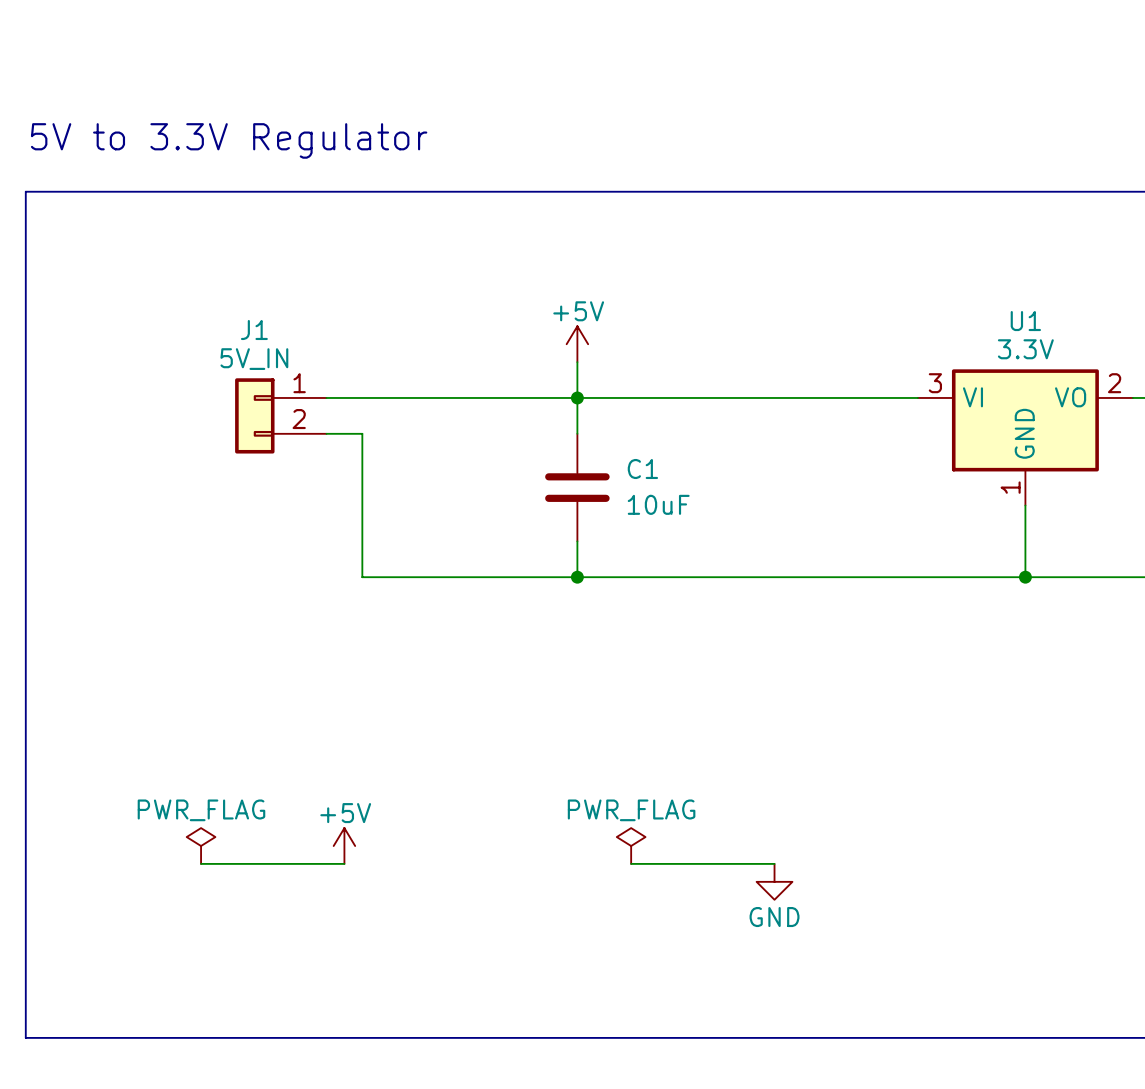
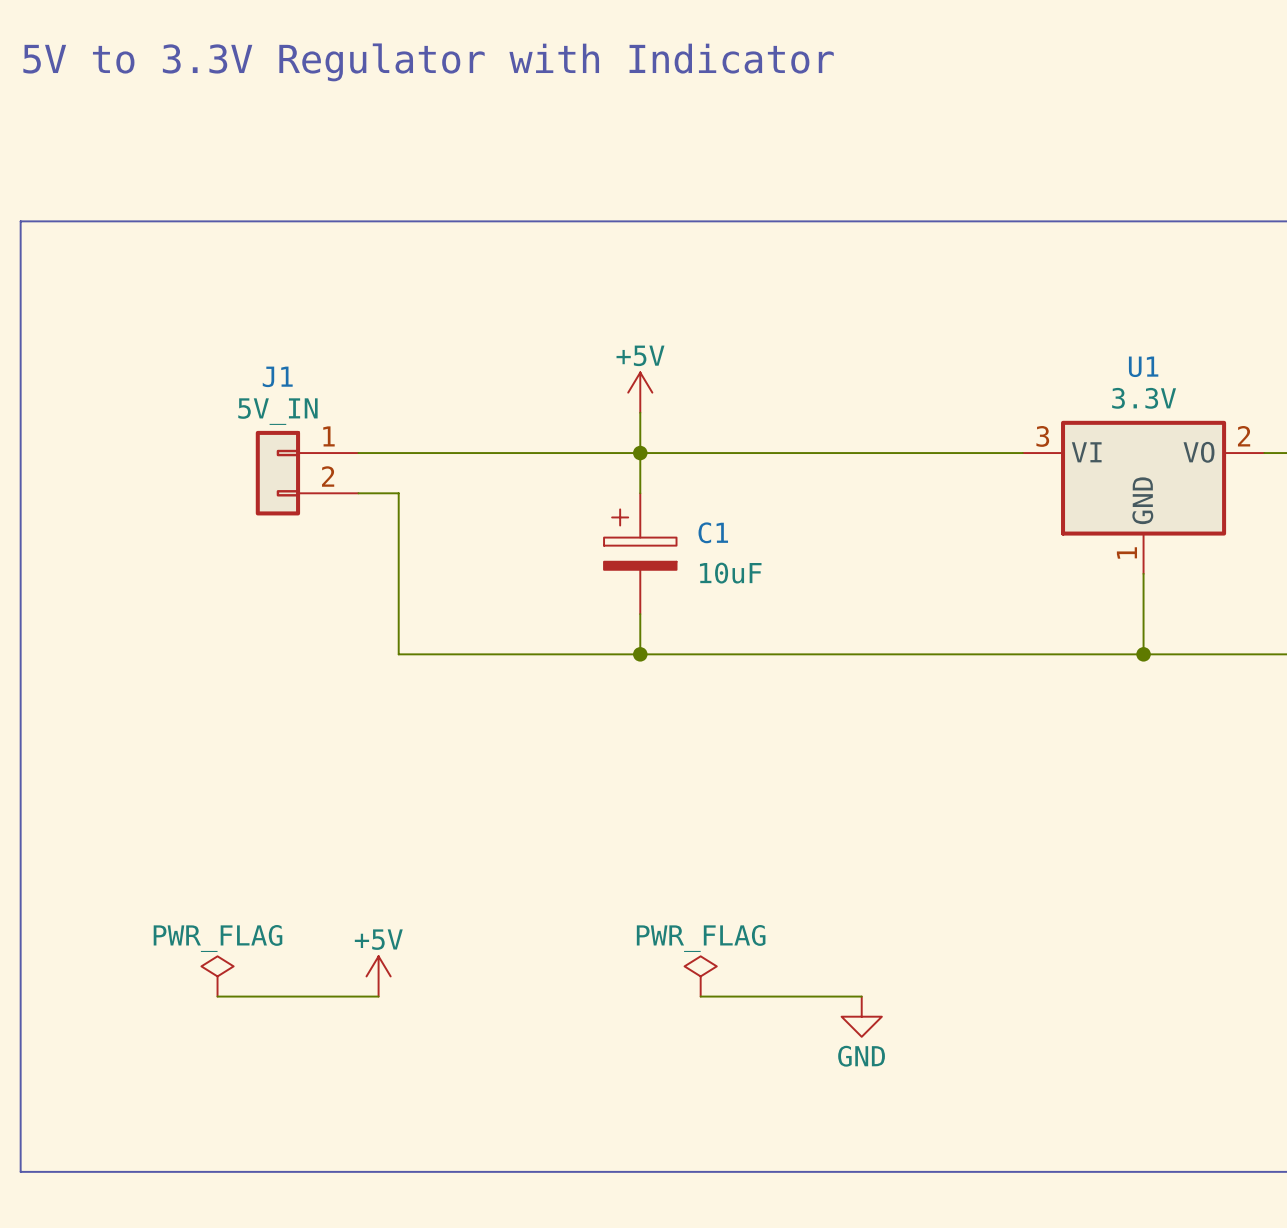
text: none -> 5V to 3.3V Regulator with Indicator (428, 62)
text: 5V to 3.3V Regulator (229, 140) -> none
C1 symbol: [545, 433, 610, 542] -> [604, 493, 677, 615]
power symbol position: PWR_FLAG (201, 846) -> PWR_FLAG (217, 976)
power symbol position: +5V (344, 846) -> +5V (378, 976)
power symbol position: PWR_FLAG (631, 846) -> PWR_FLAG (700, 976)
wire: (201, 863) (344, 863) -> (217, 996) (378, 996)
wire: (631, 863) (774, 863) -> (700, 996) (861, 996)
power symbol position: GND (774, 881) -> GND (861, 1016)

